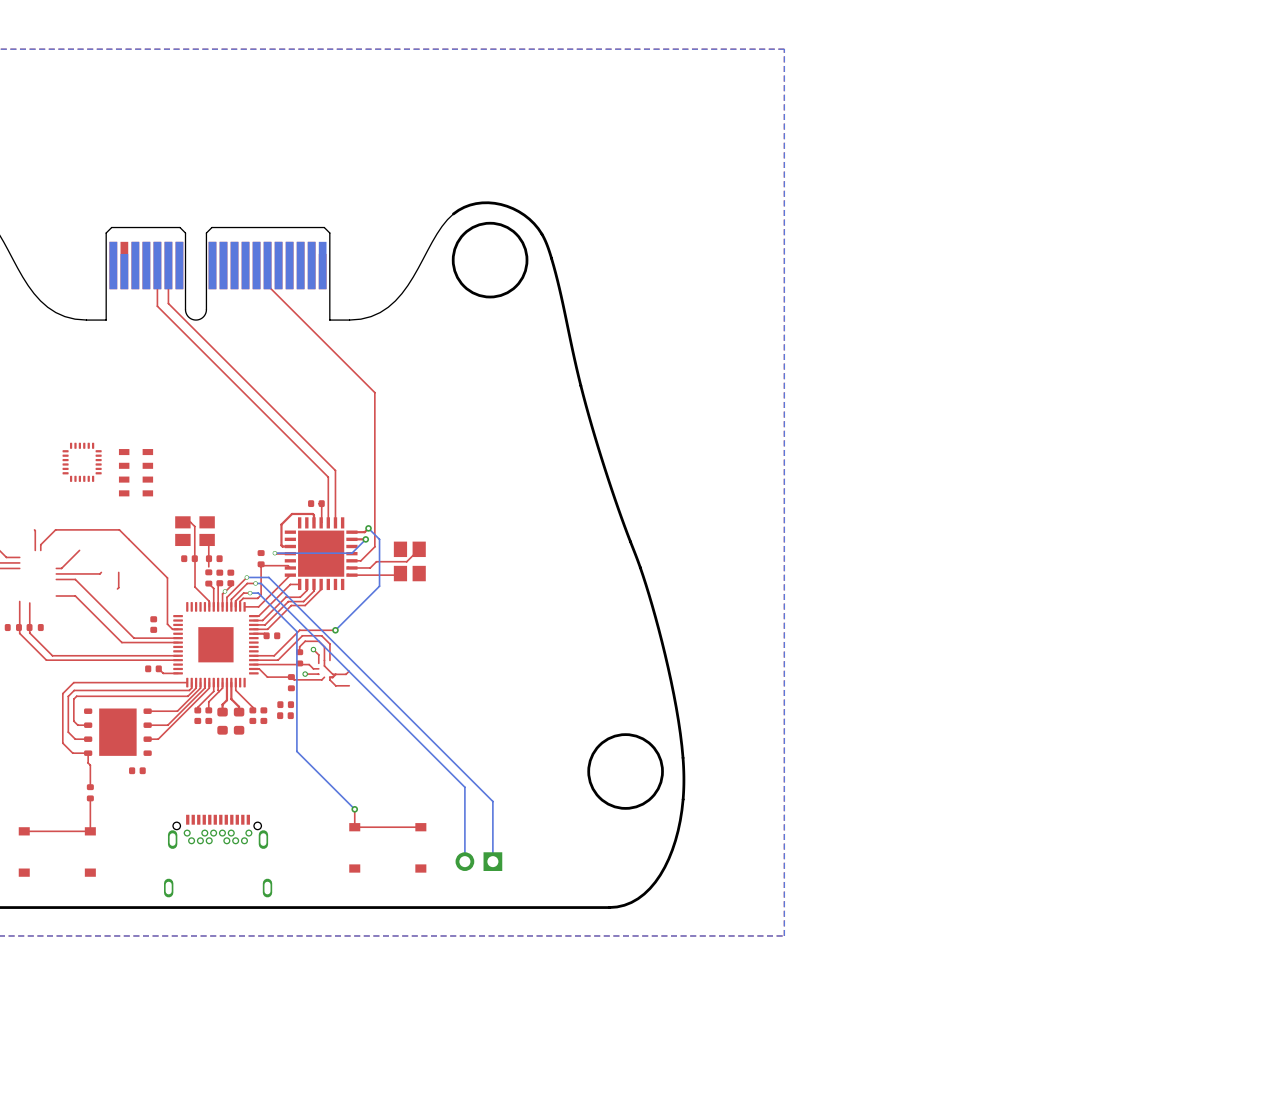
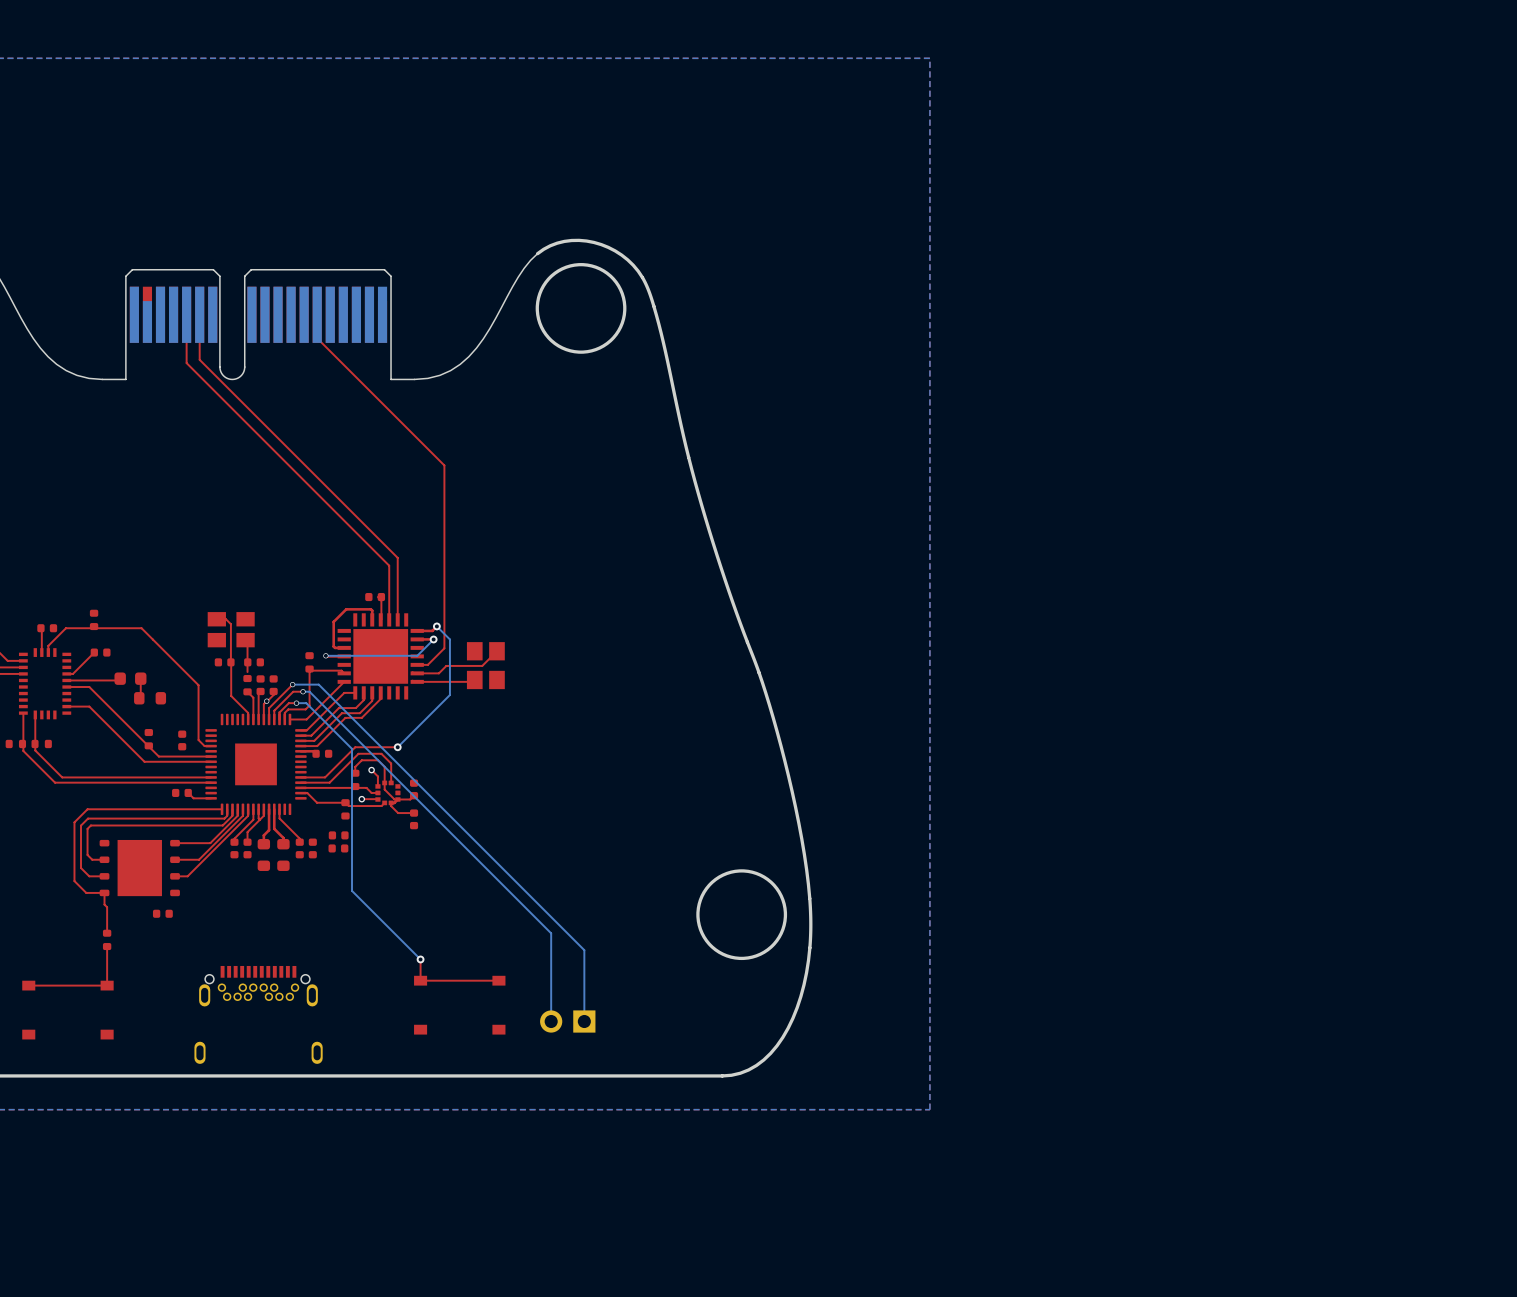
part: (82, 462) -> none
part: (136, 472) -> none
part: none -> (94, 619)
part: none -> (47, 628)
part: none -> (100, 652)
part: none -> (130, 678)
part: none -> (45, 683)
part: none -> (150, 698)
part: none -> (148, 739)
part: none -> (414, 789)
part: none -> (387, 792)
part: none -> (414, 819)

